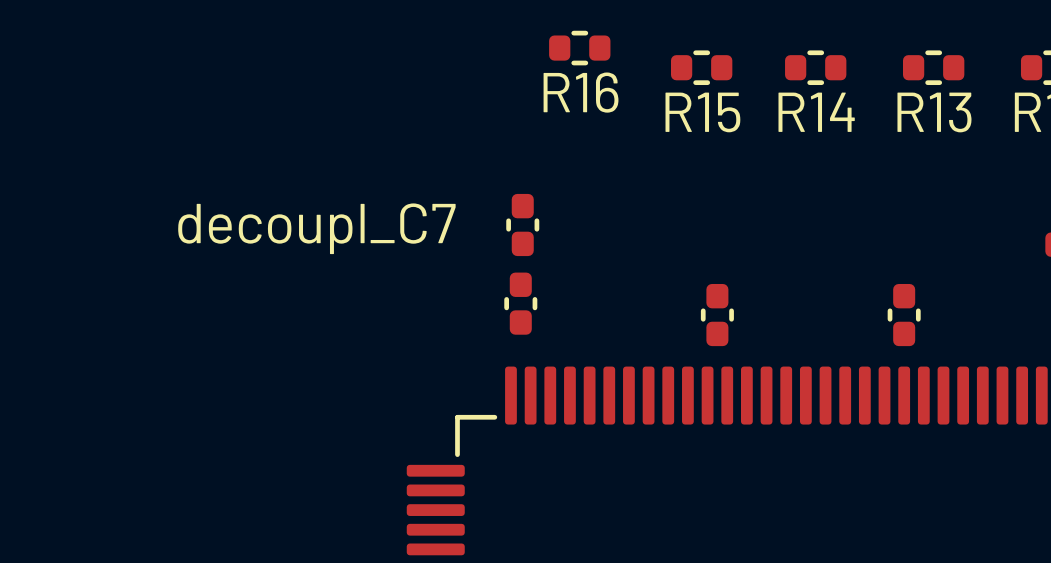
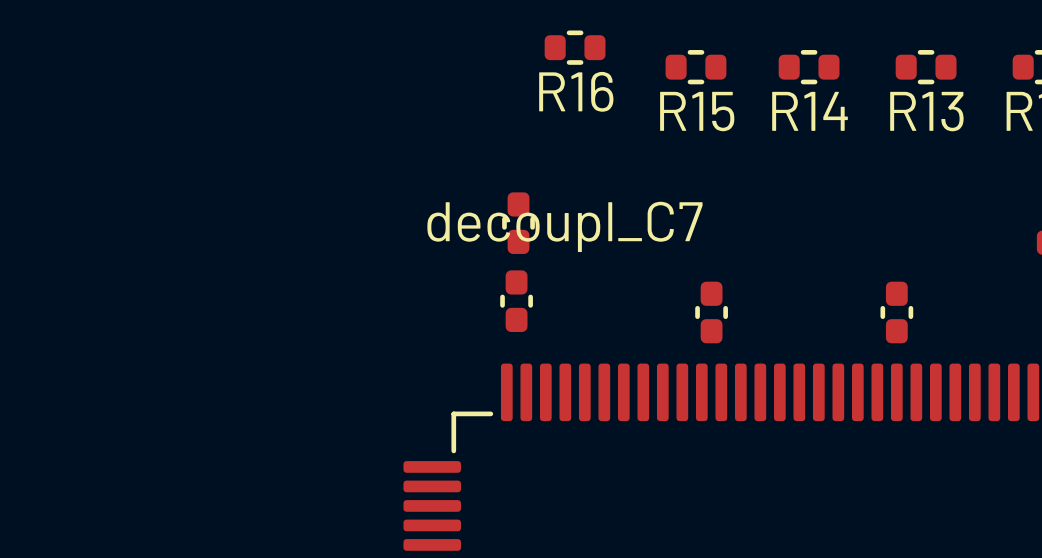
decoupl_C7 name position: decoupl_C7 (316, 228) -> decoupl_C7 (564, 226)

